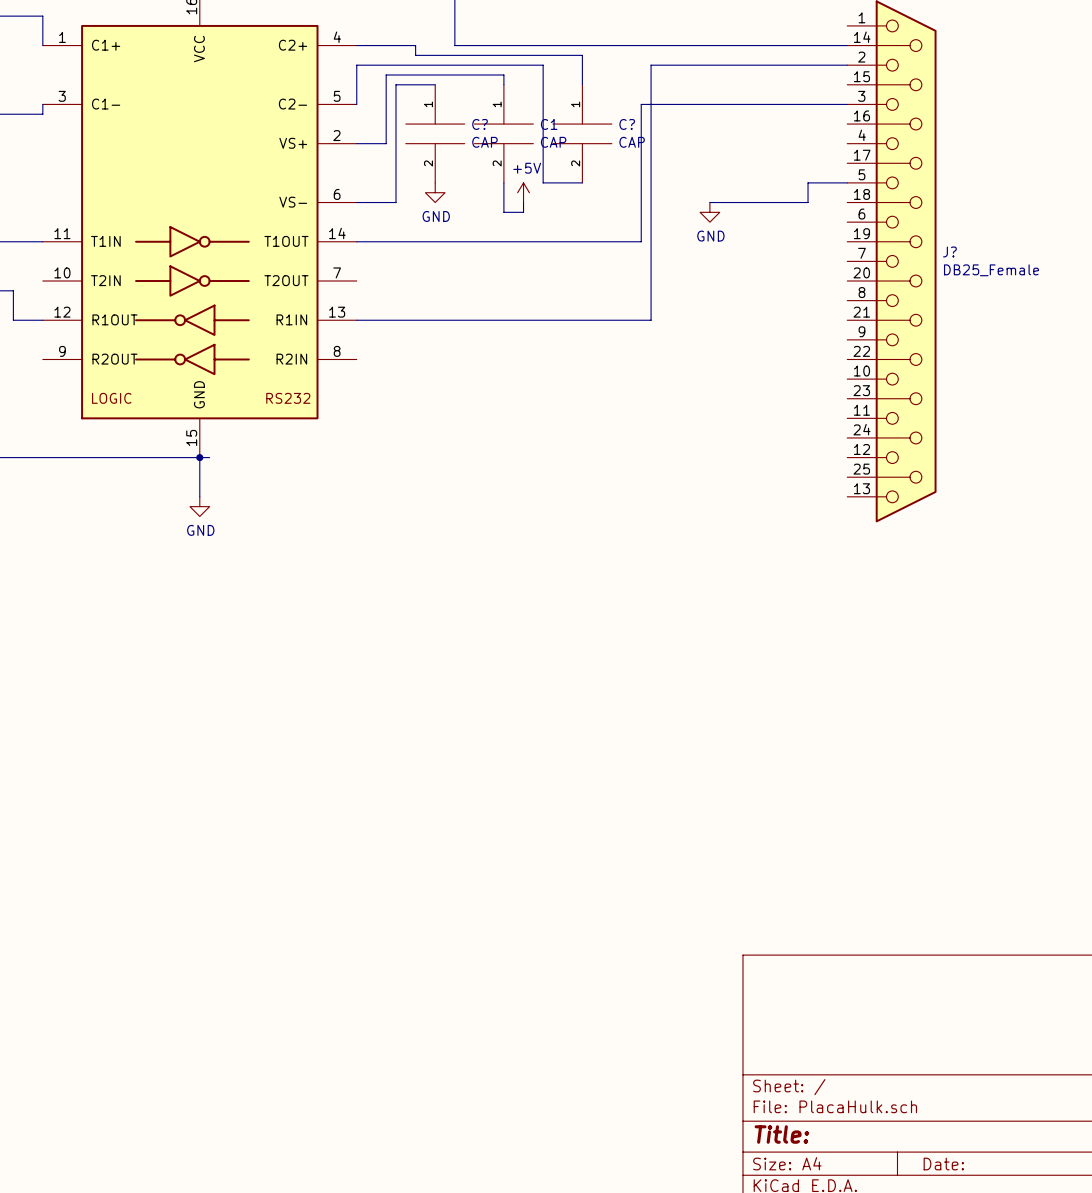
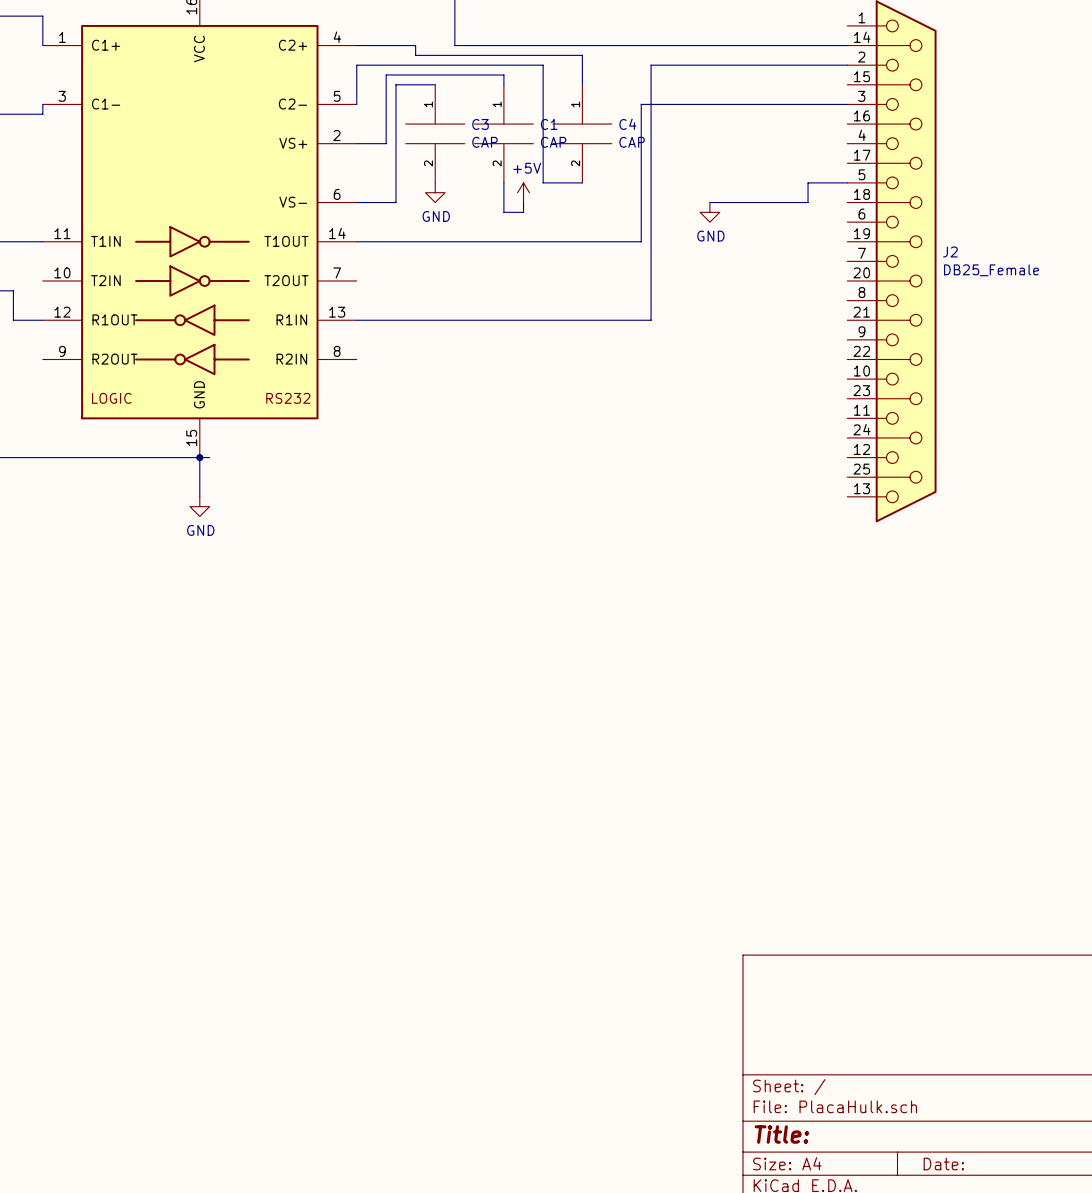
C? name: C? (480, 124) -> C3 (480, 124)
C? name: C? (627, 124) -> C4 (627, 124)
J? name: J? (949, 251) -> J2 (950, 251)

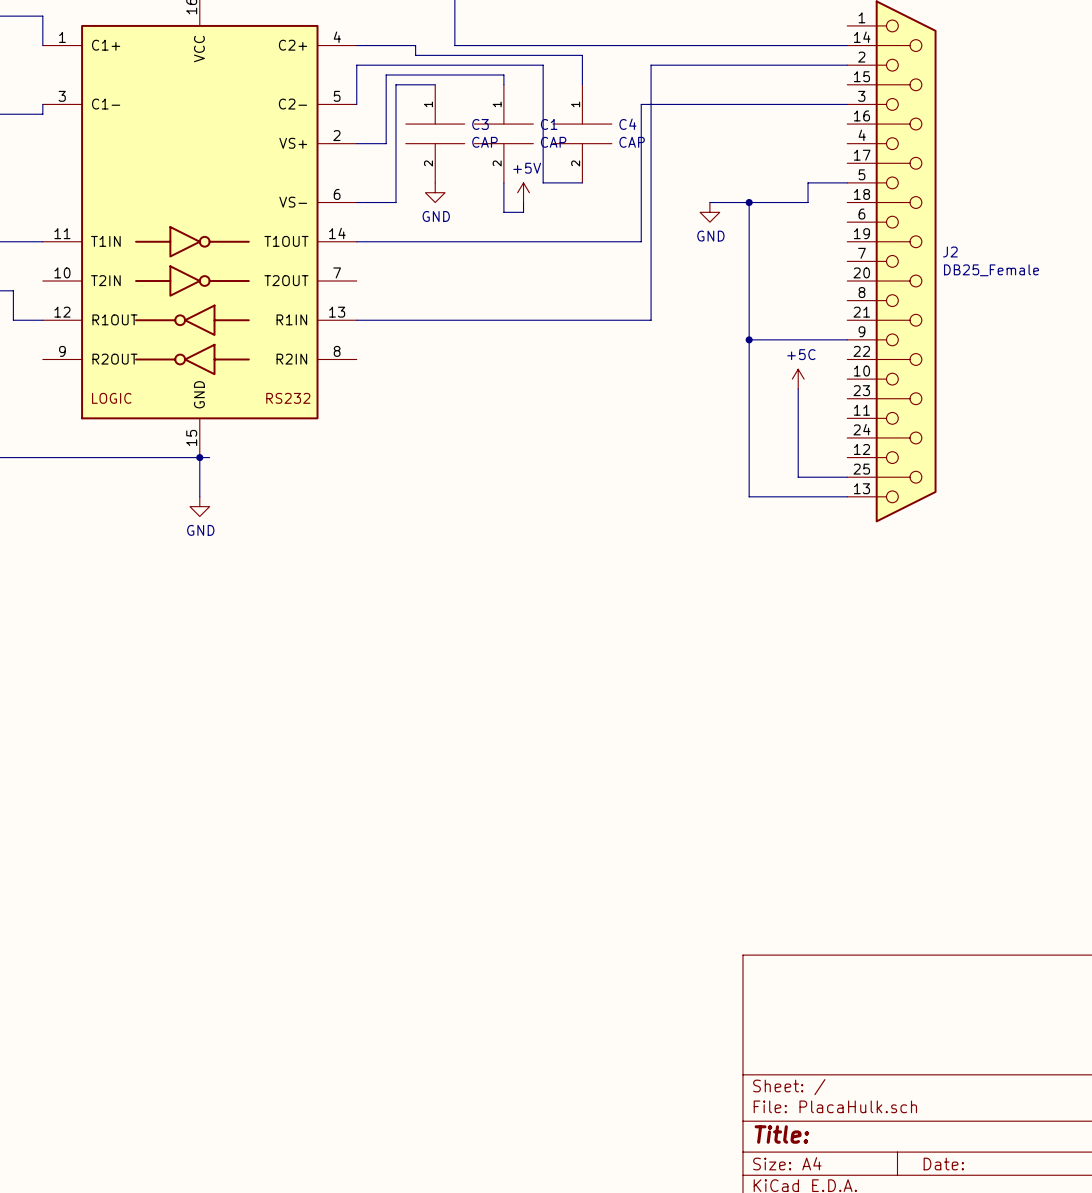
wire: none -> (749, 202) (749, 496) (847, 496)
junction: none -> (749, 202)
wire: none -> (749, 339) (847, 339)
junction: none -> (749, 339)
power symbol: none -> +5C (798, 379)
wire: none -> (798, 388) (798, 477) (847, 477)

